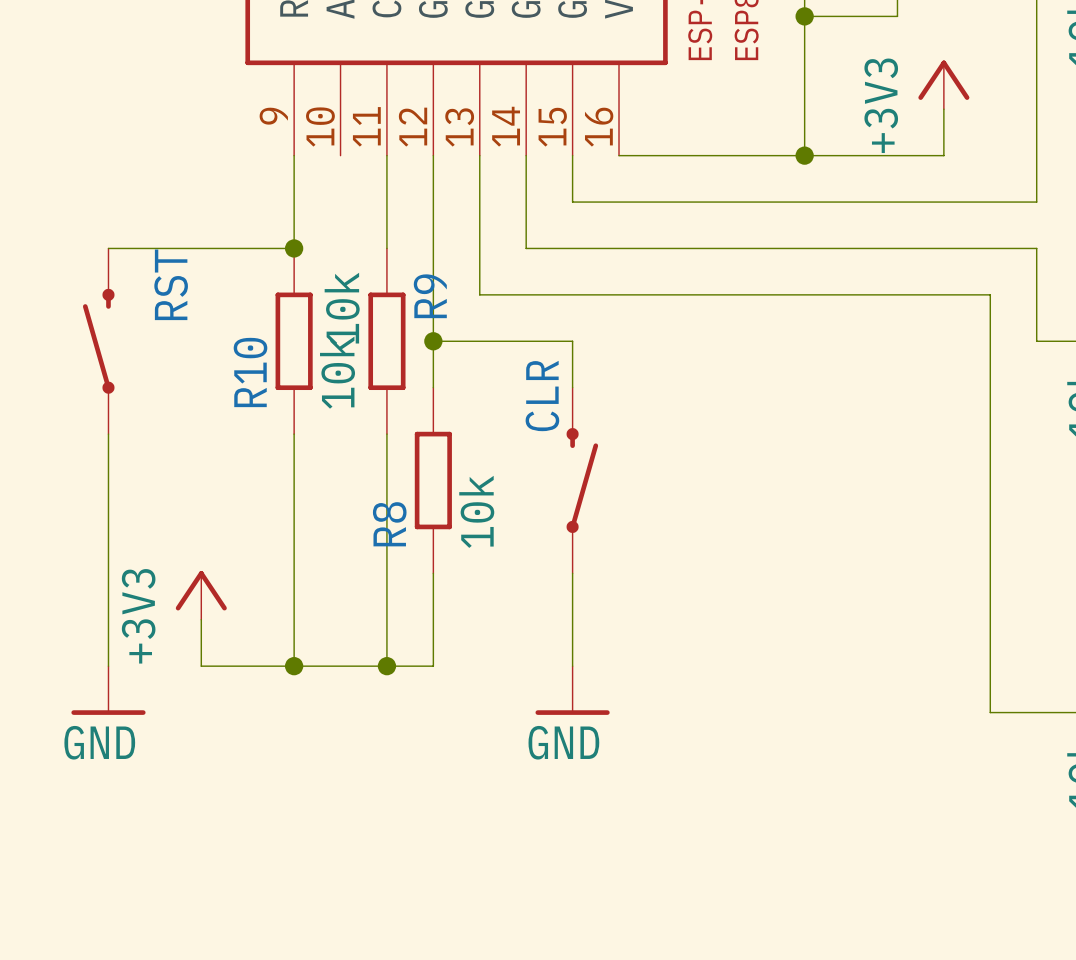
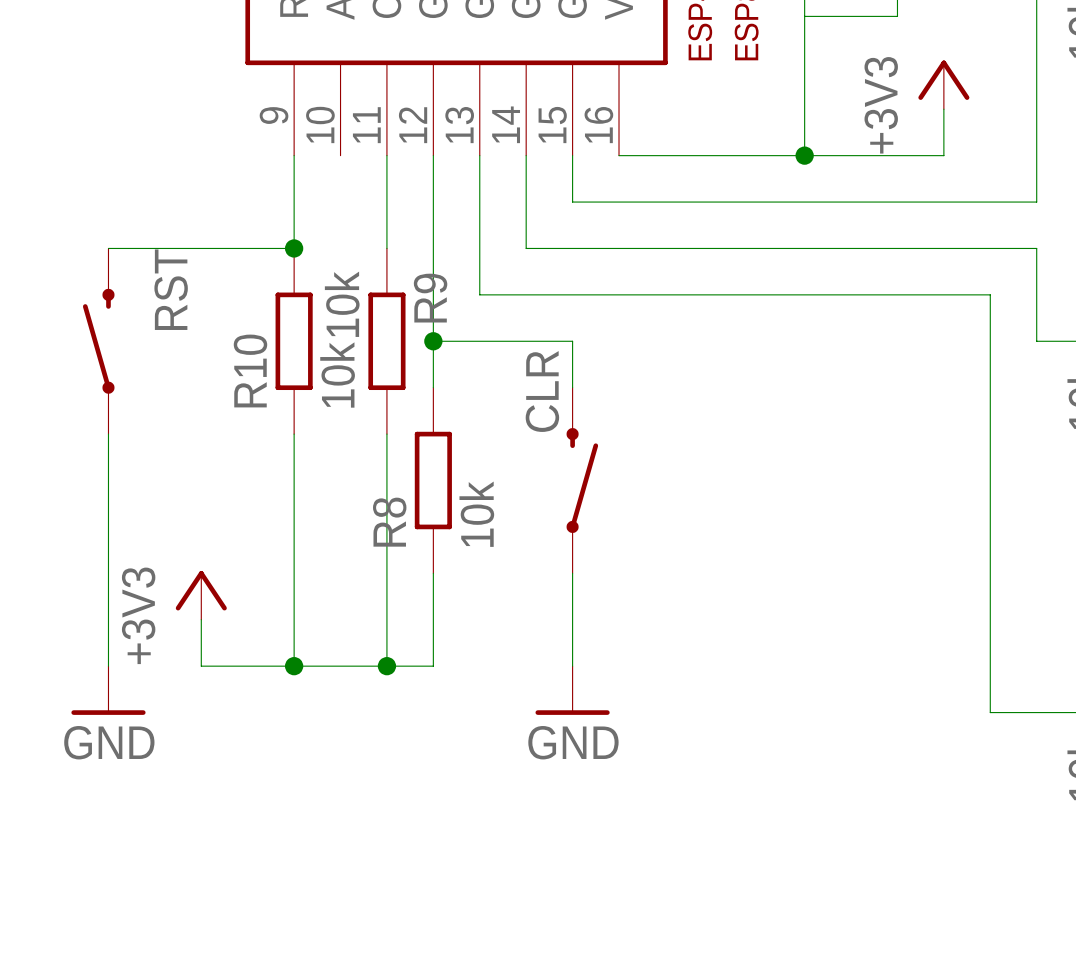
junction: (804, 16) -> none

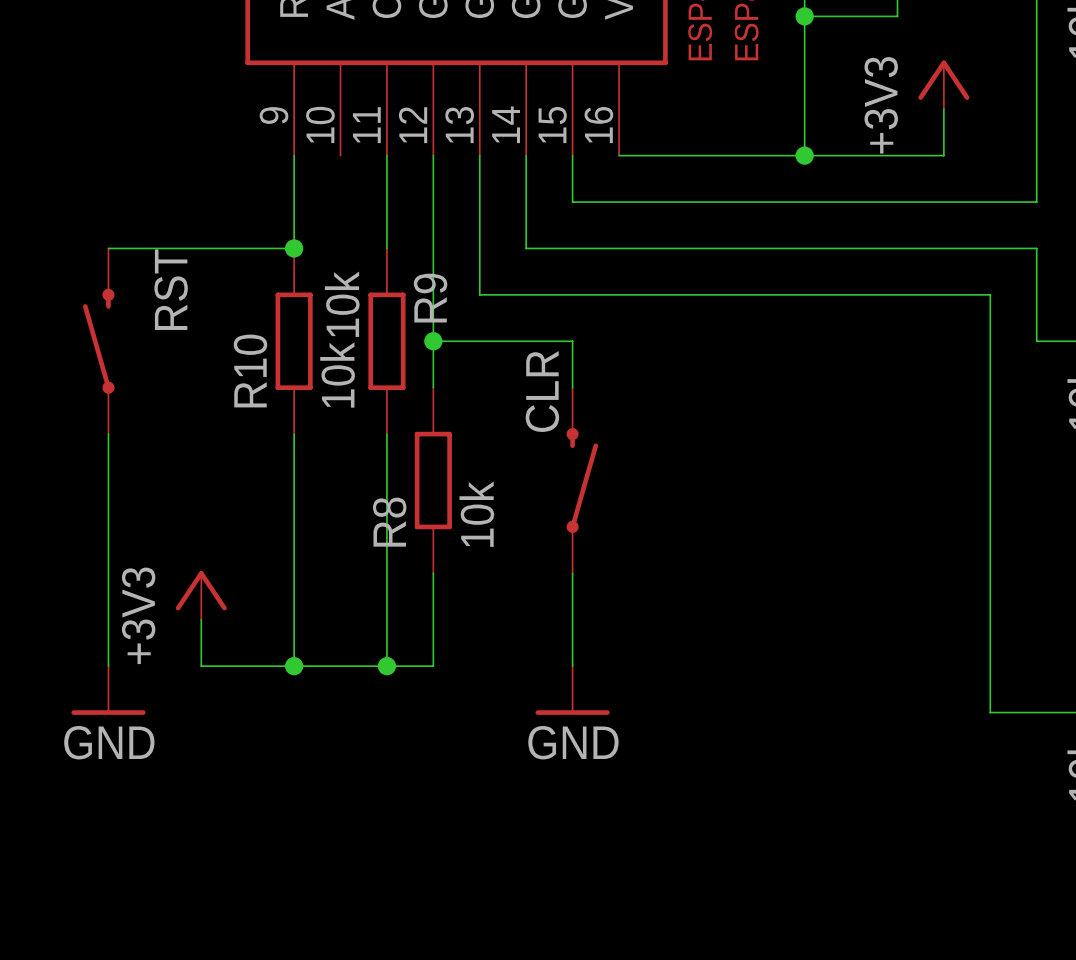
junction: none -> (804, 16)

